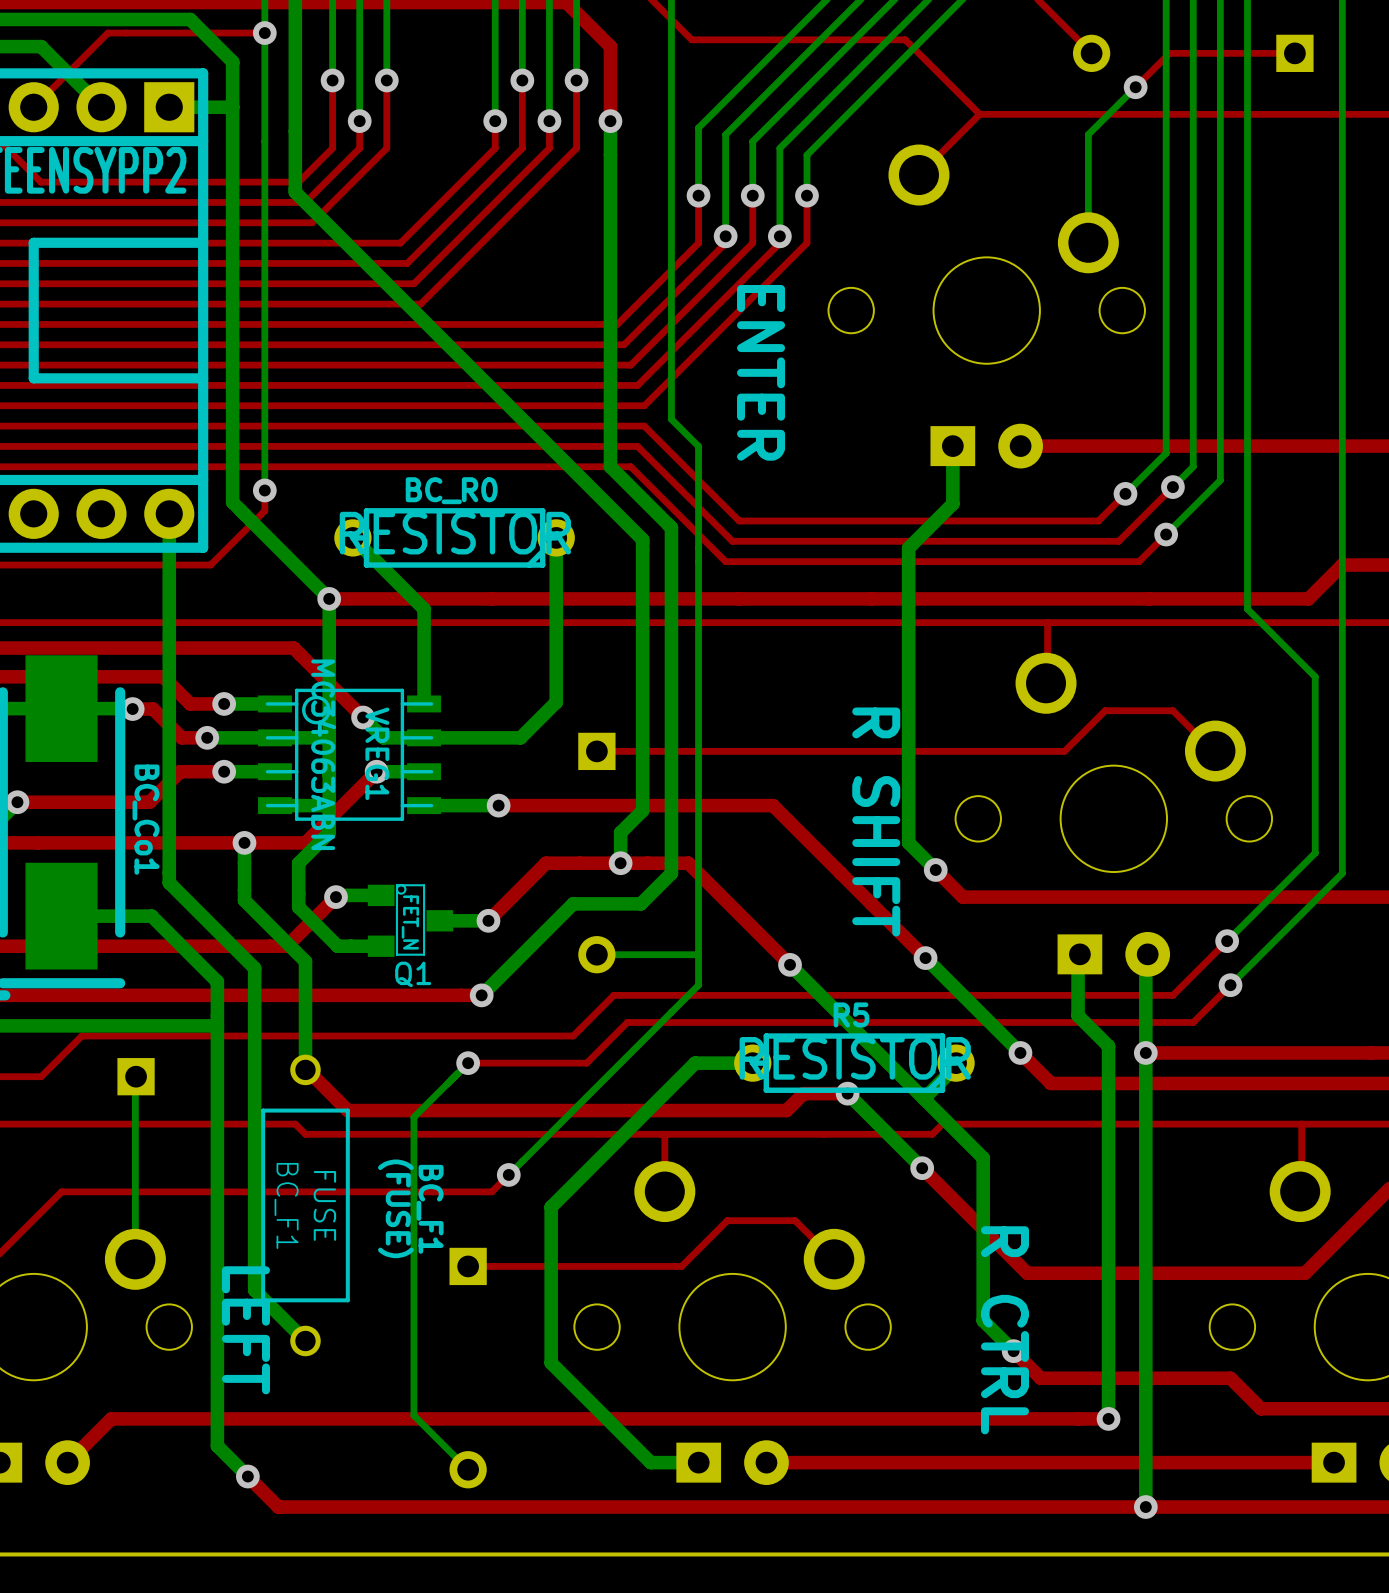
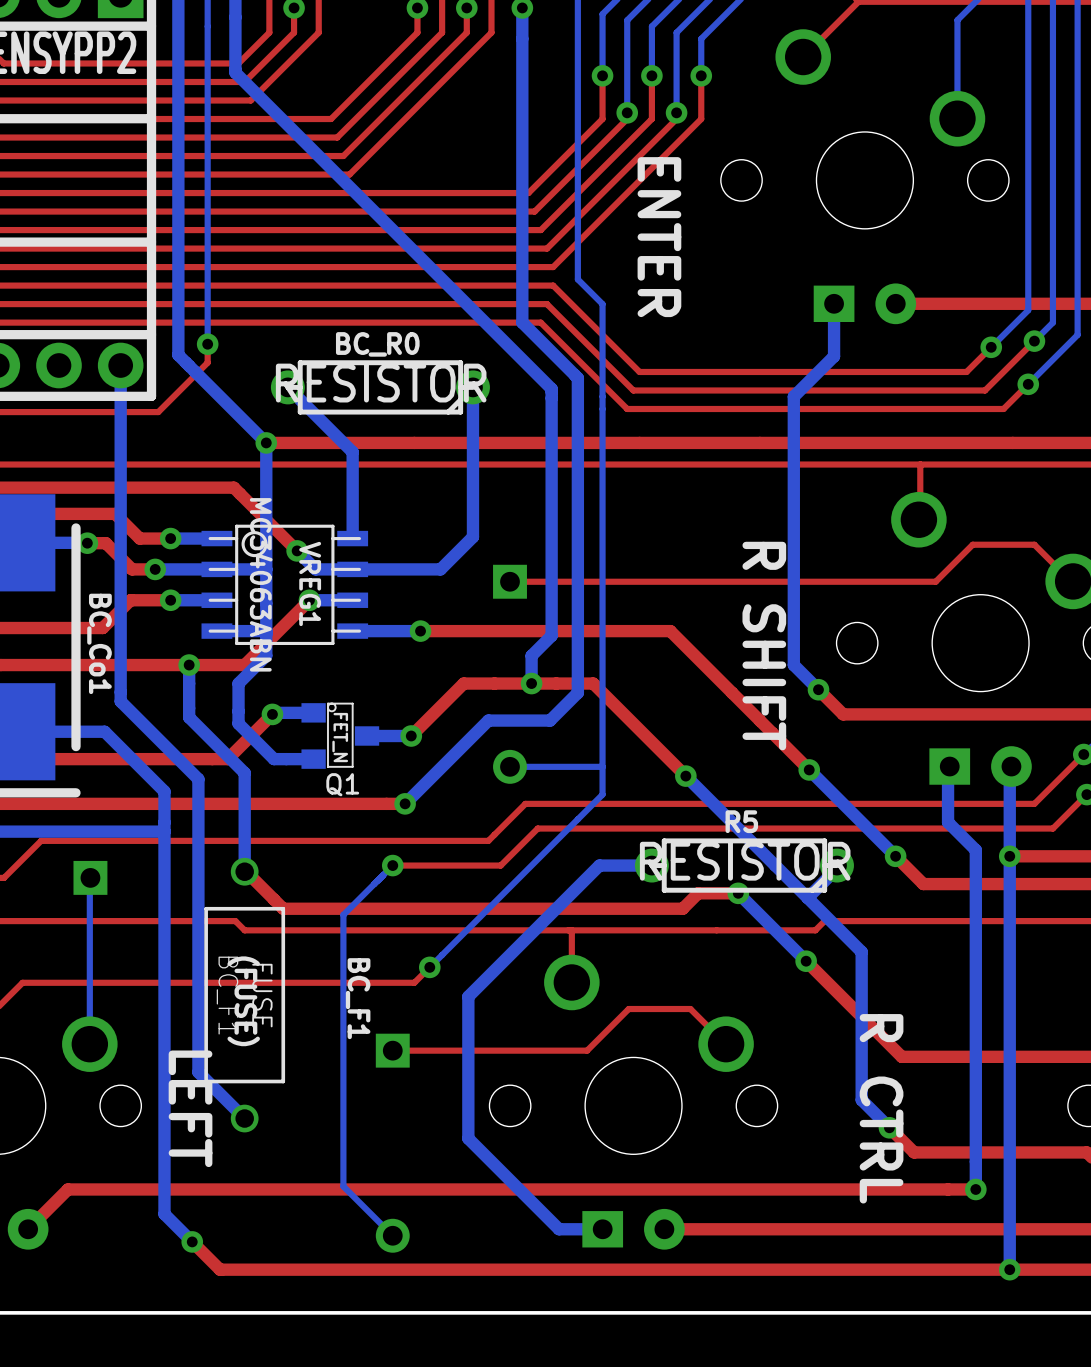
text position: (FUSE) (395, 1208) -> (FUSE) (243, 1001)

